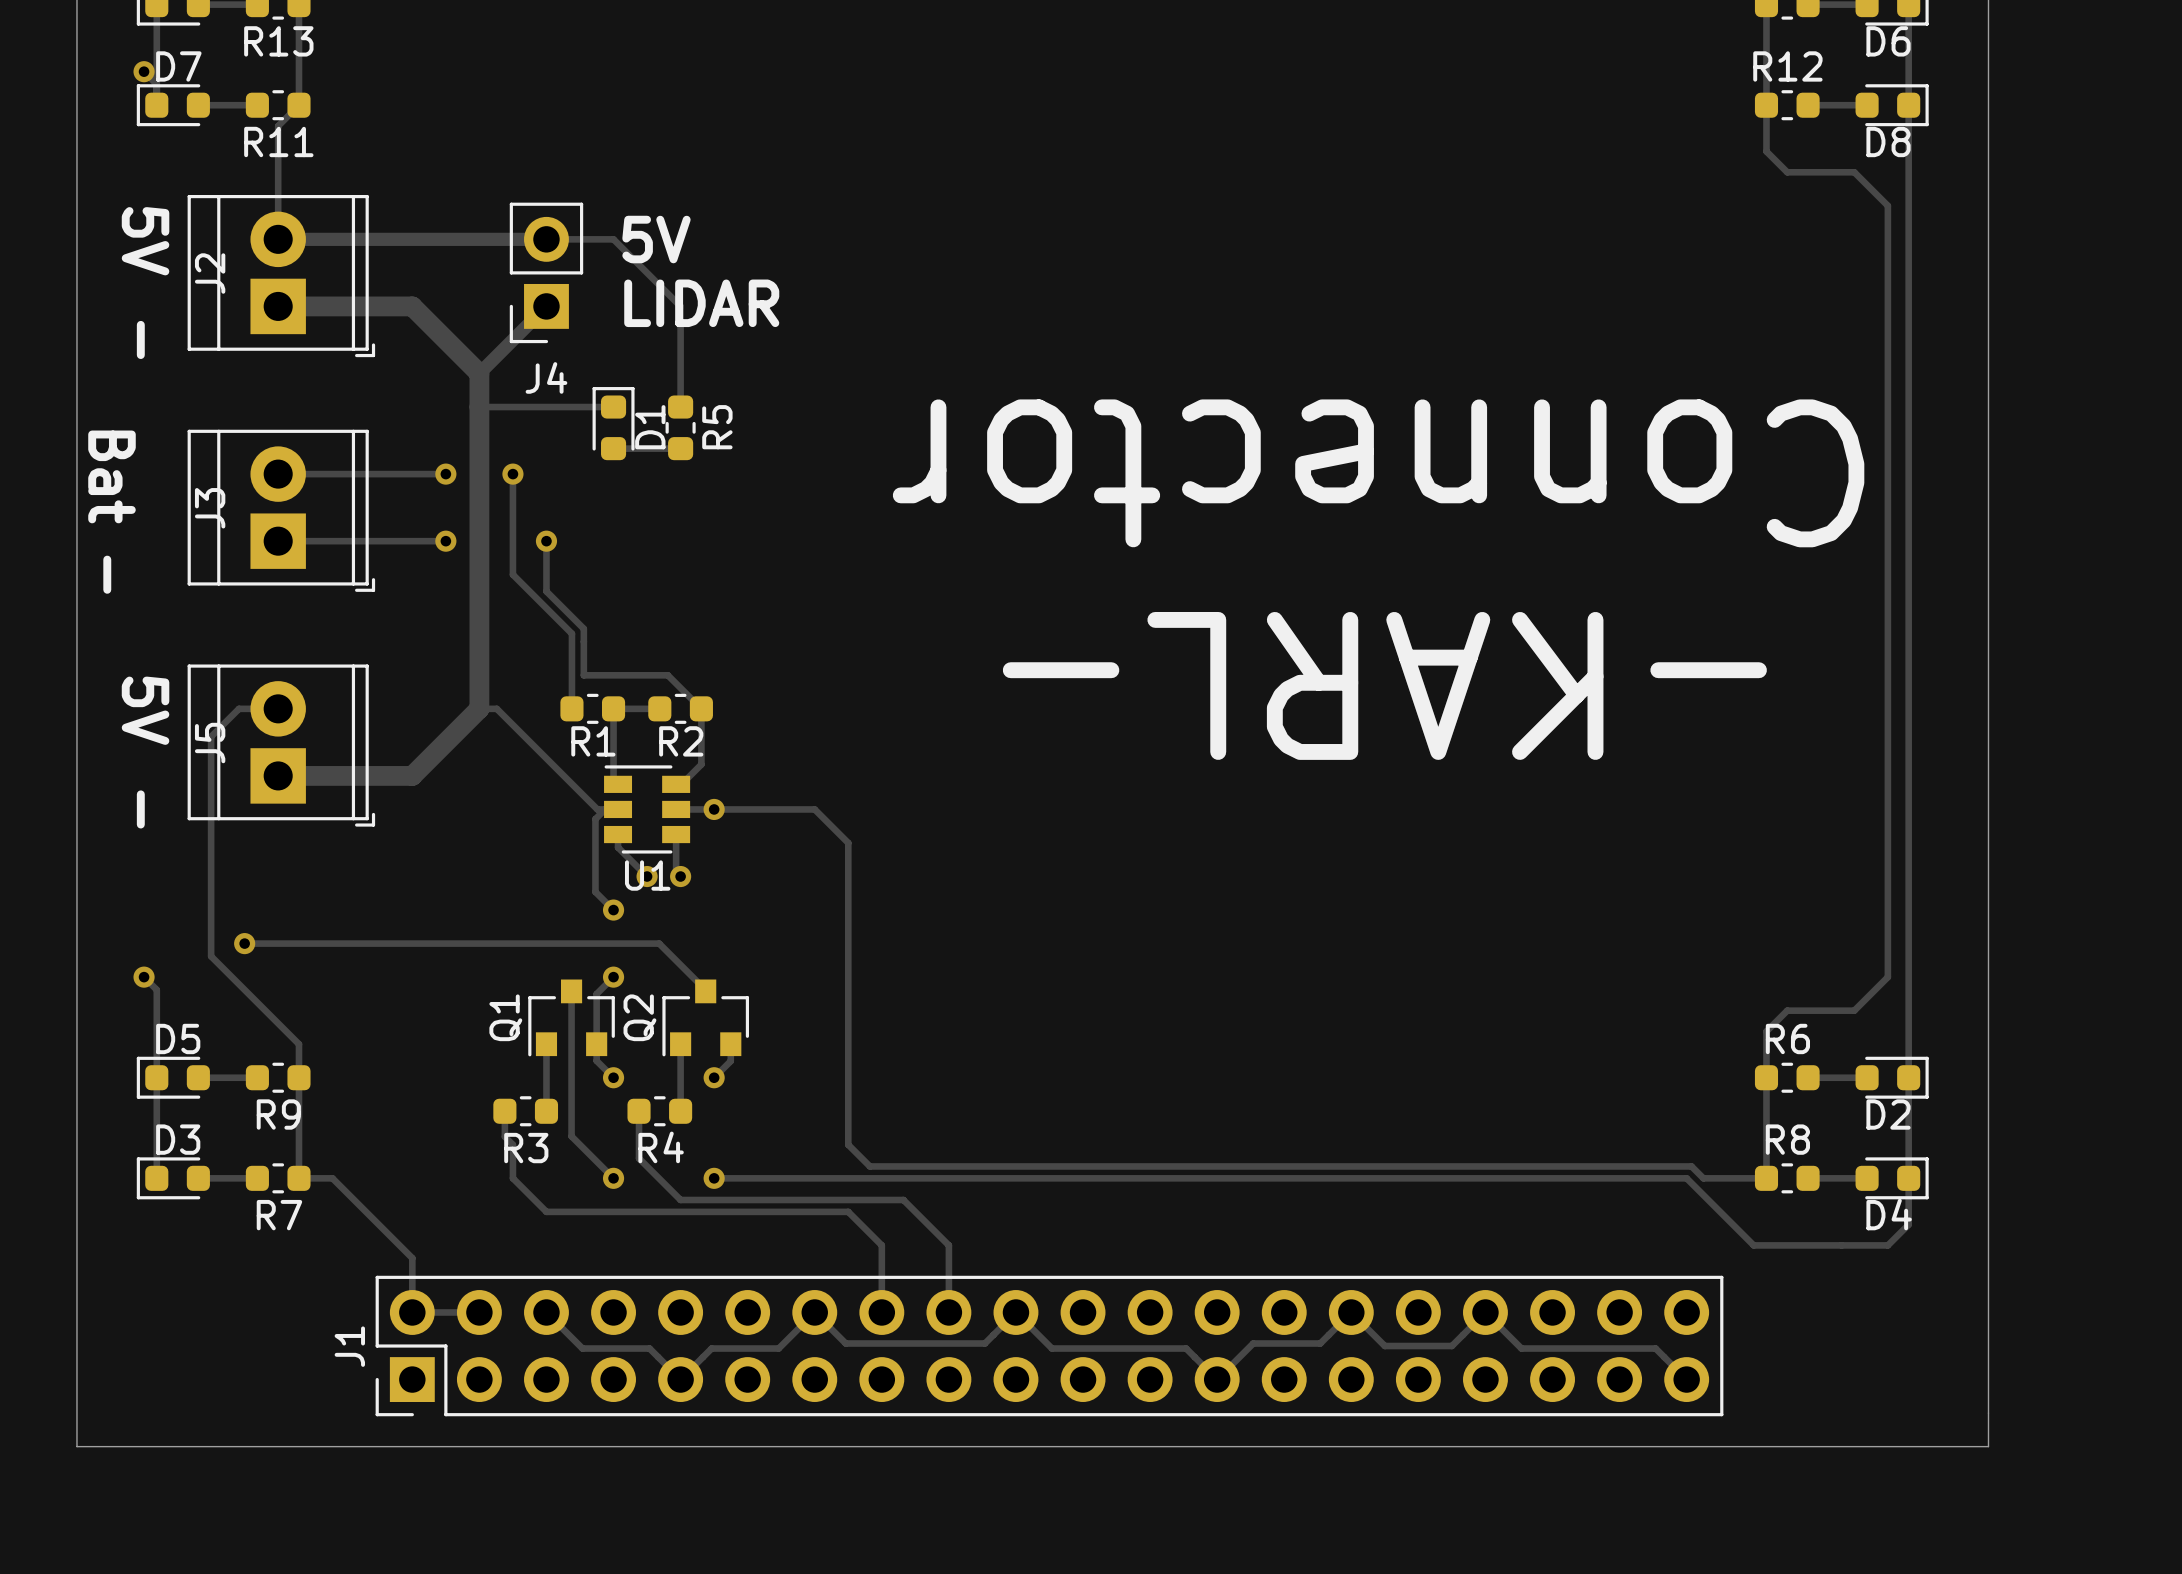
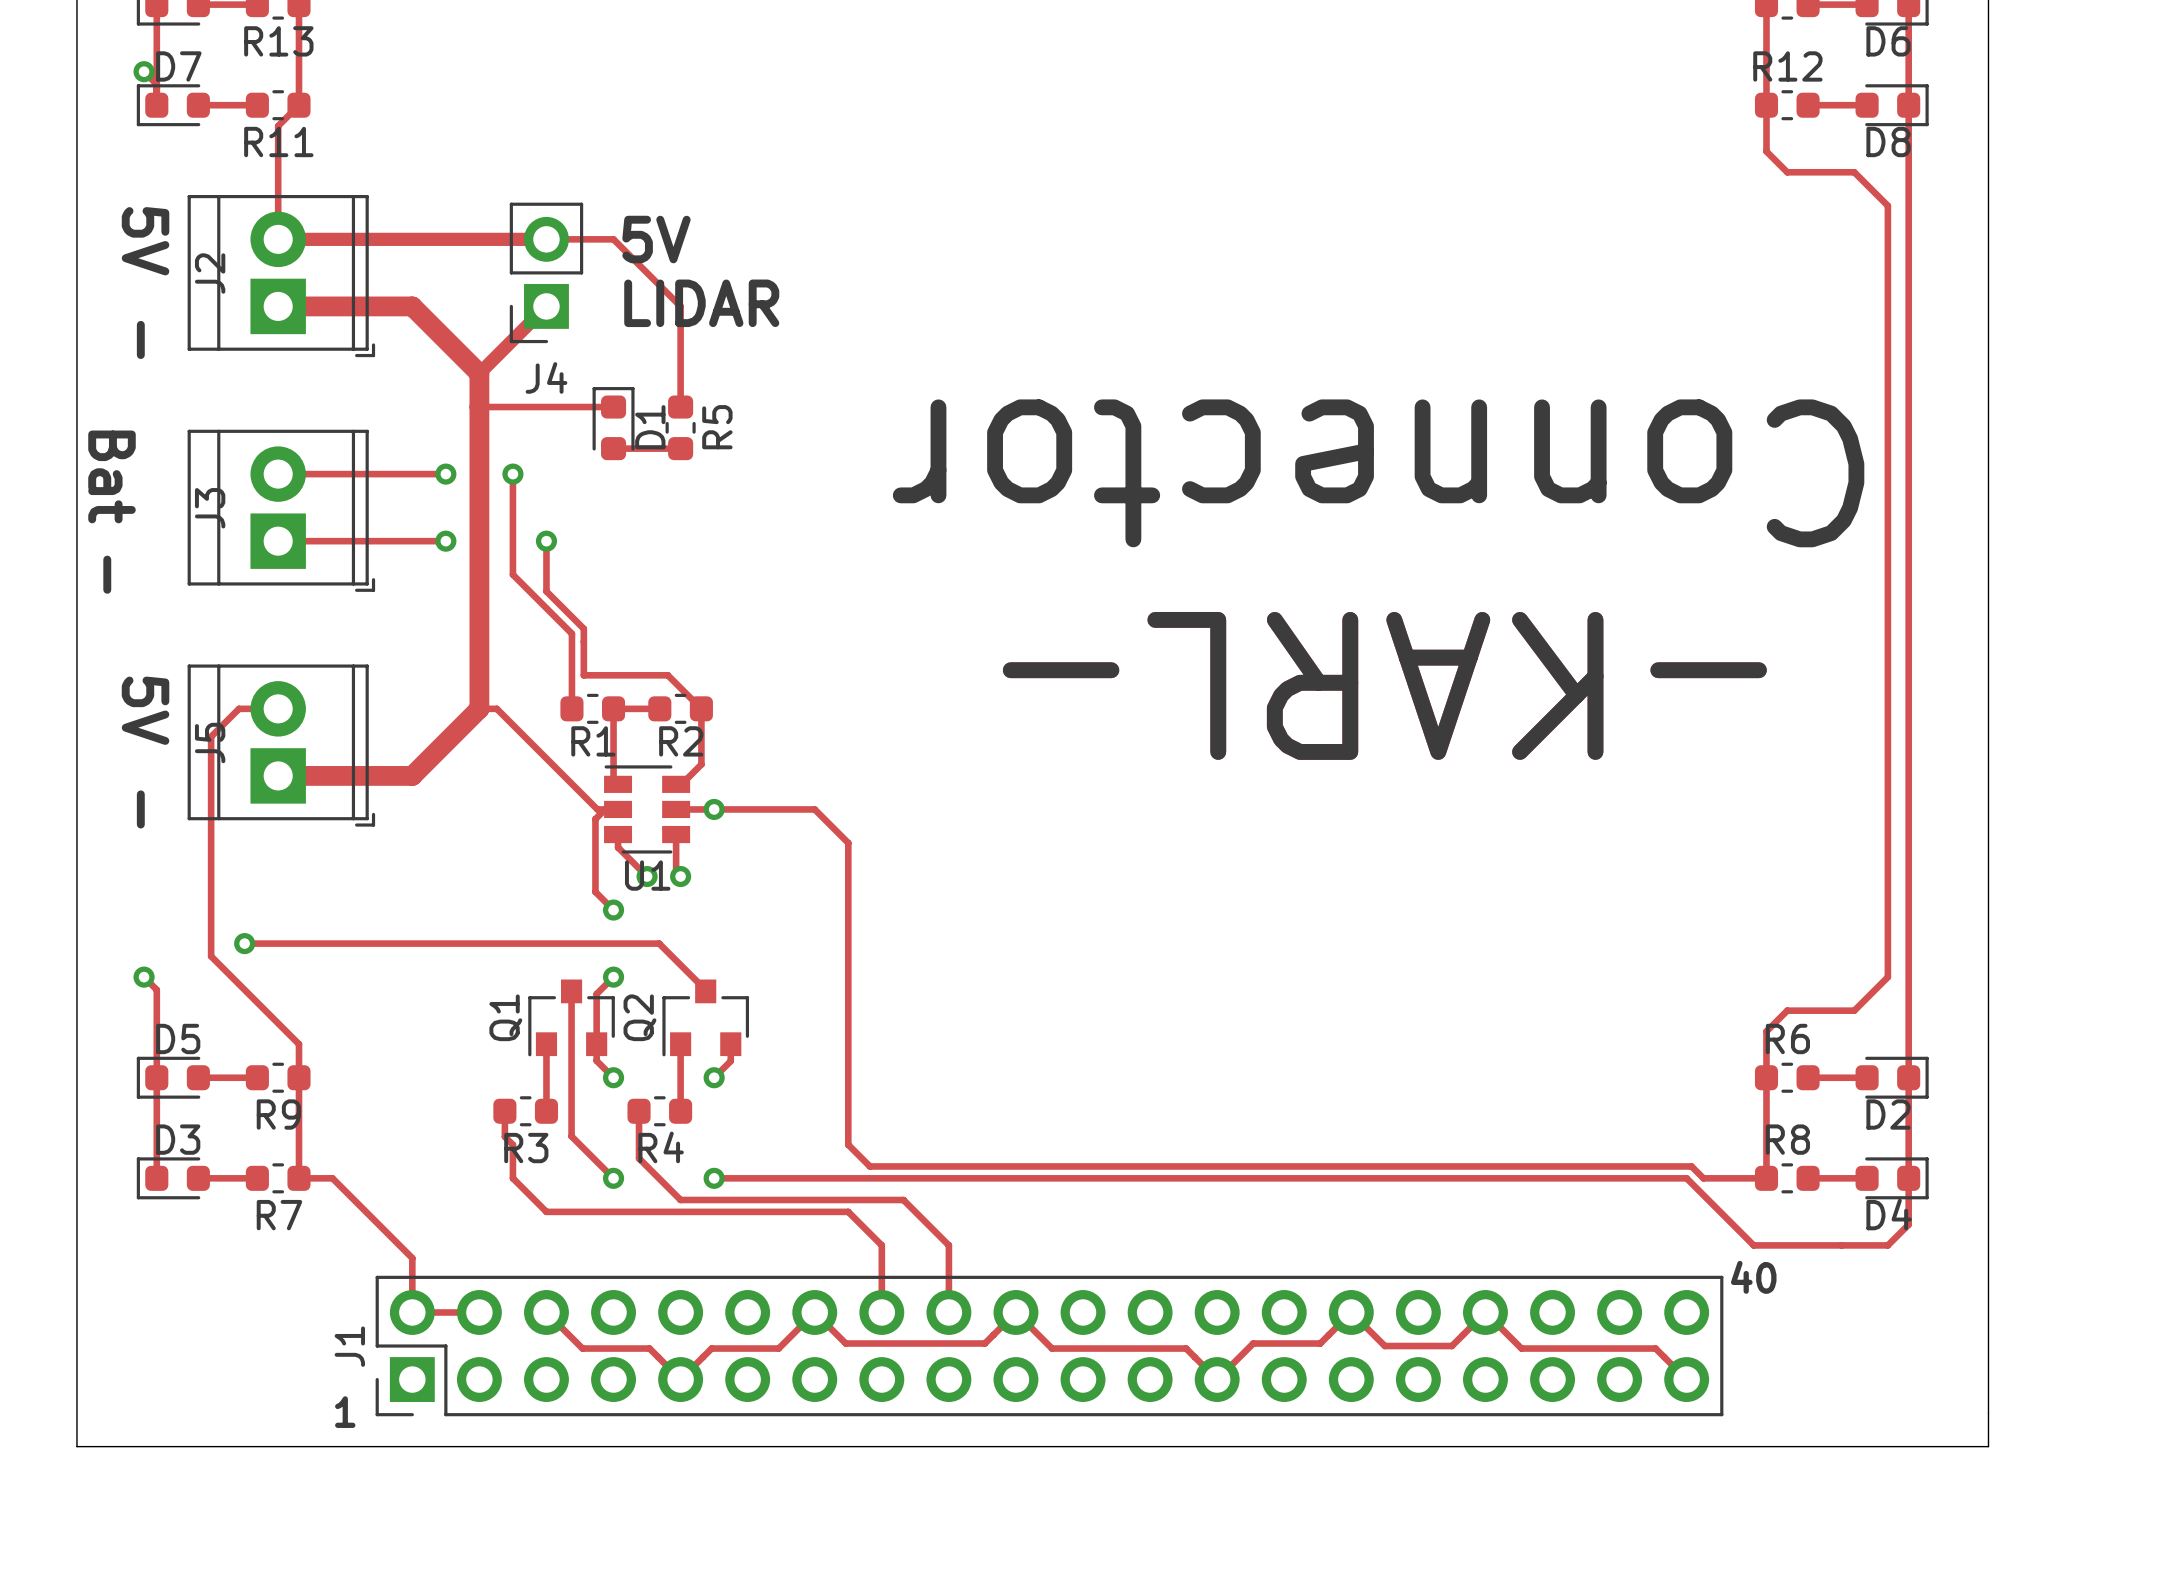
text: none -> 40 (1753, 1277)
text: none -> 1 (345, 1412)

